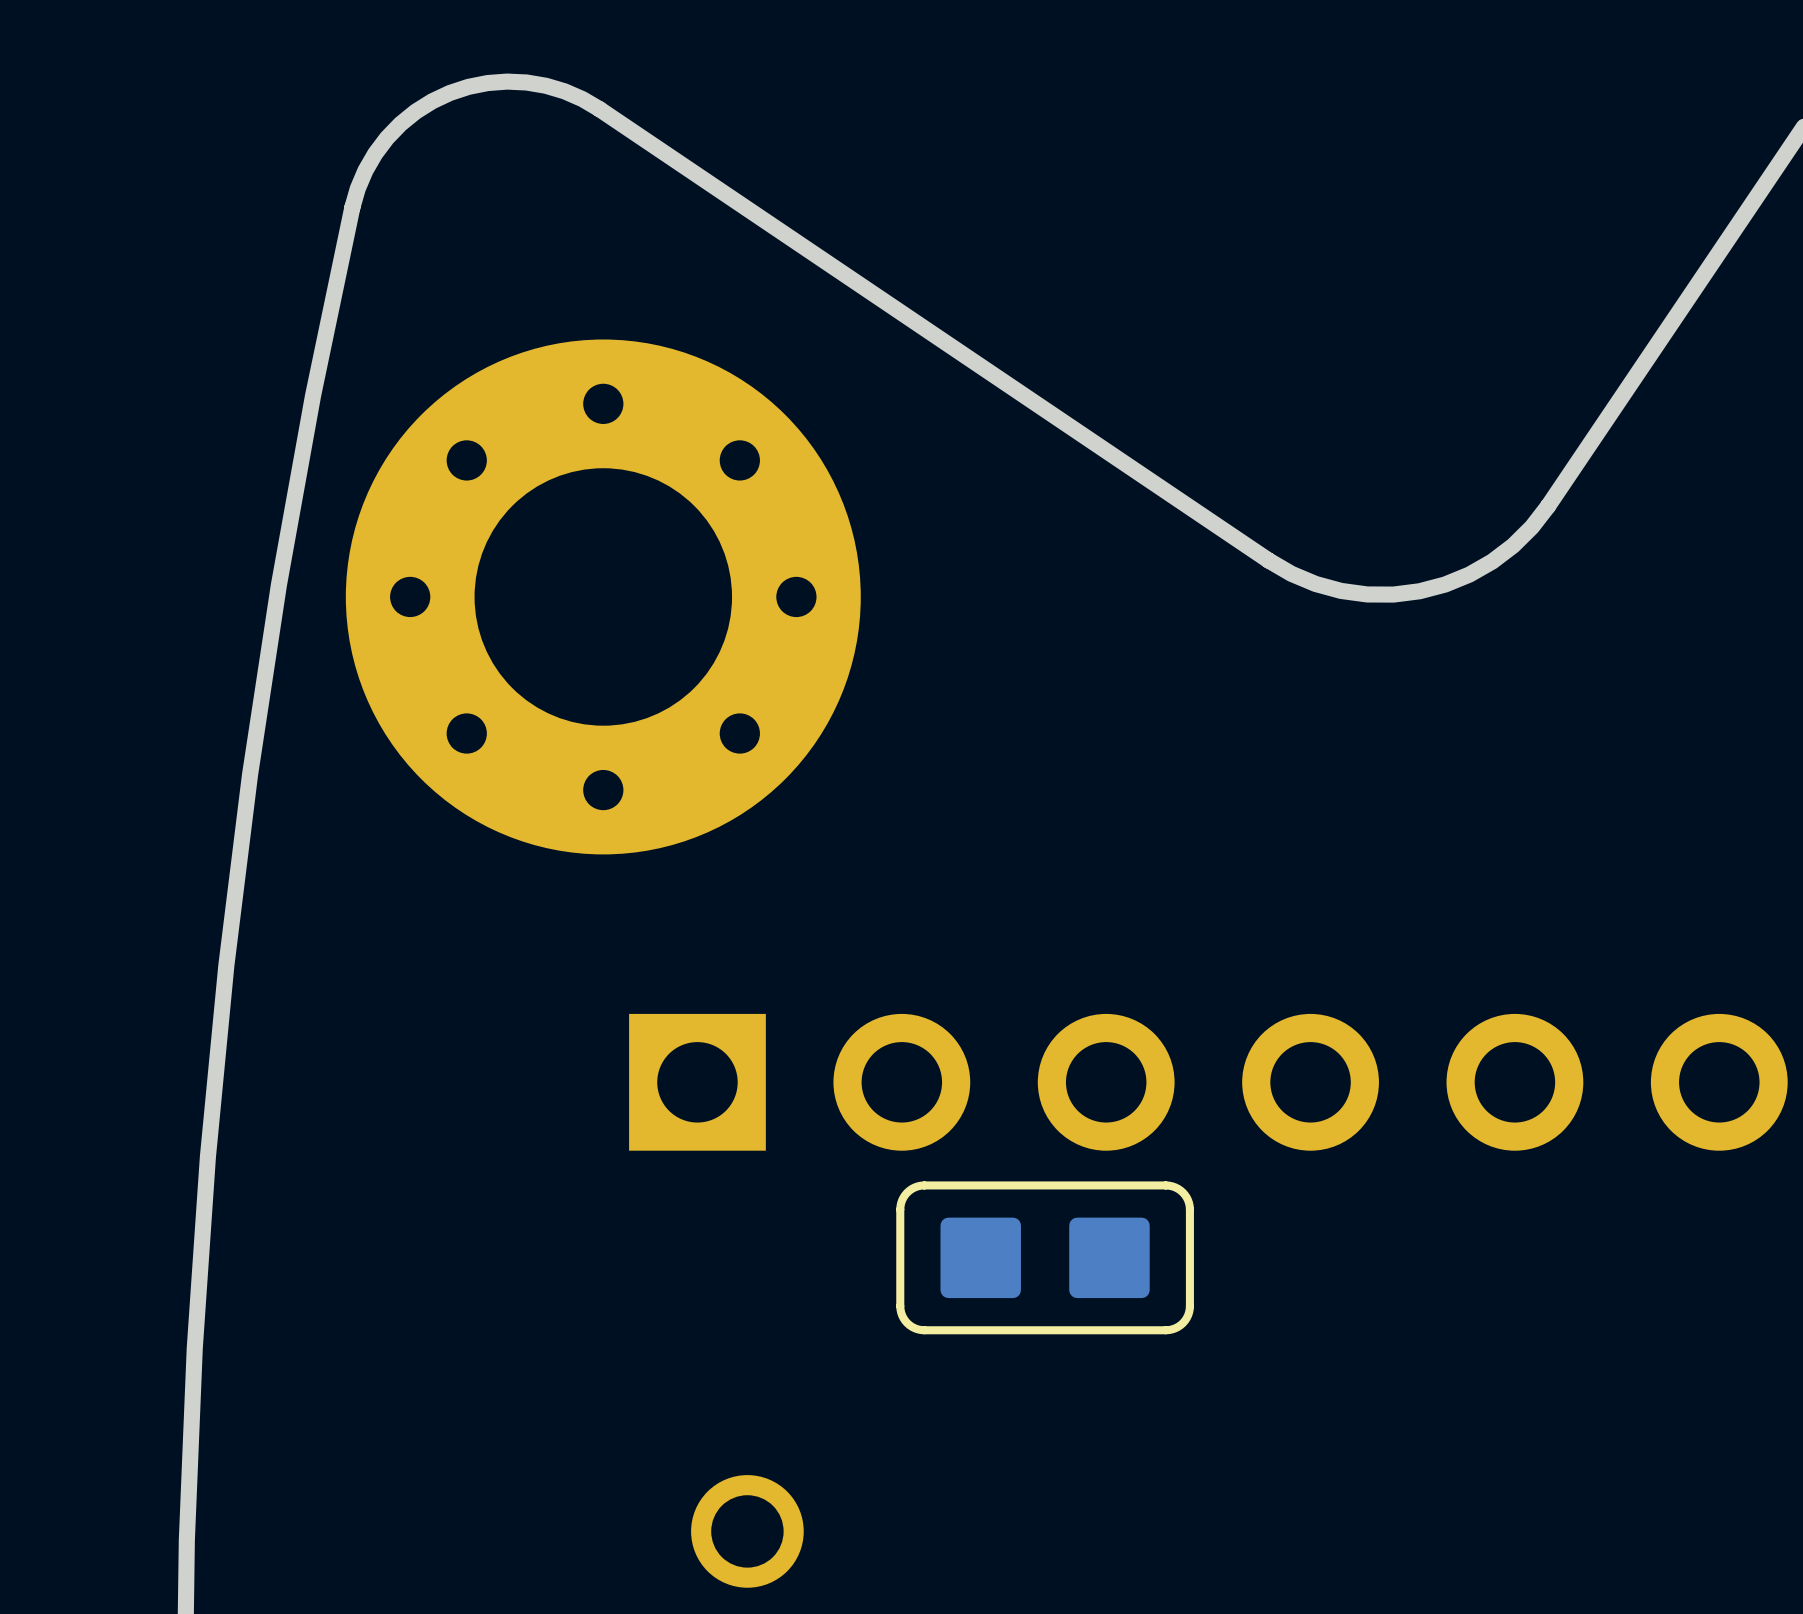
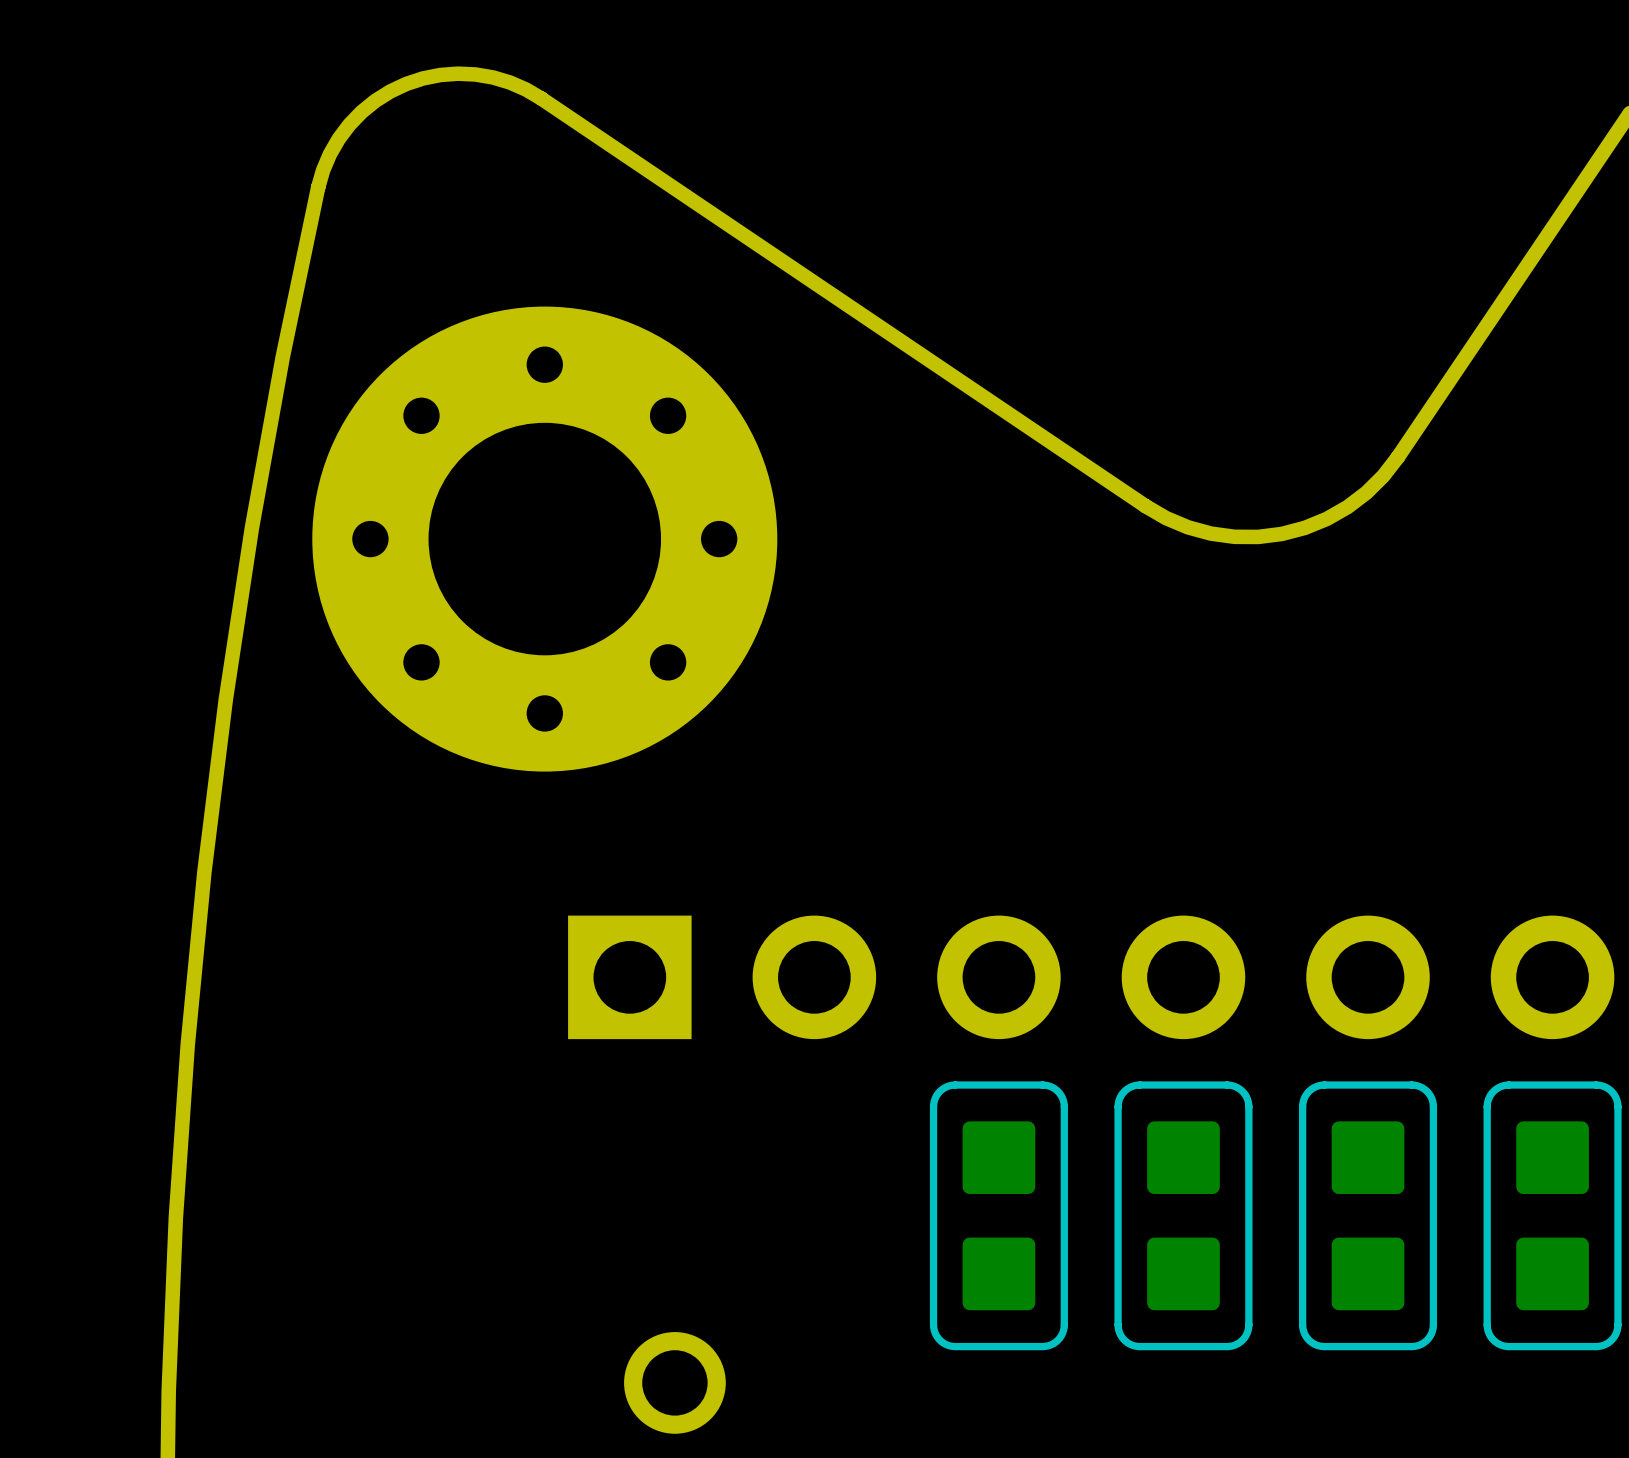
part rotation: 0° (1045, 1257) -> 90° clockwise (998, 1215)
part: none -> (1183, 1215)
part: none -> (1368, 1215)
part: none -> (1552, 1215)

